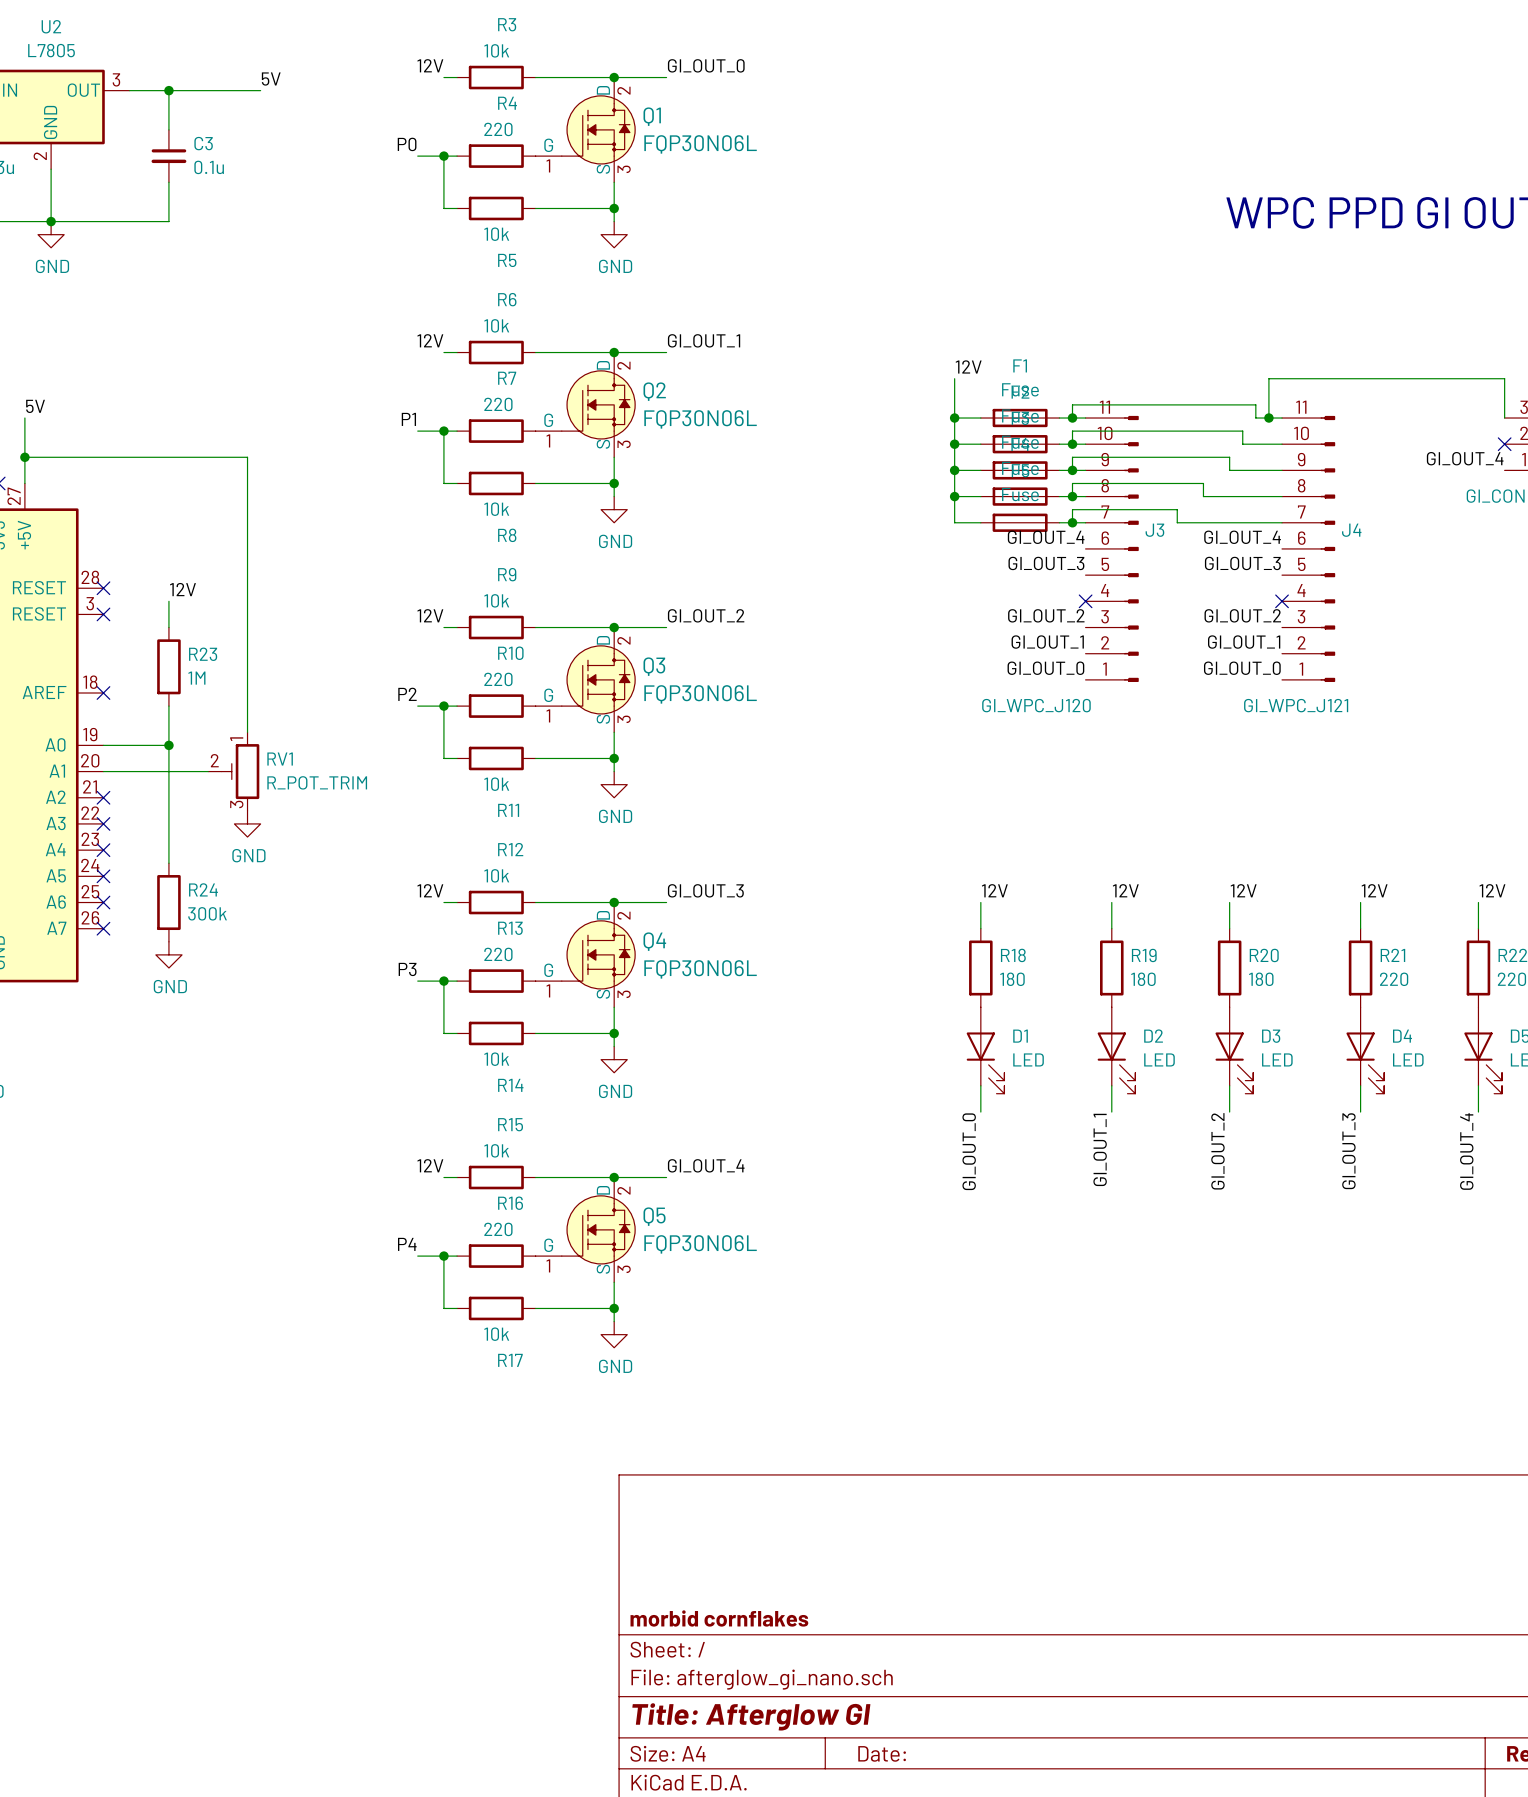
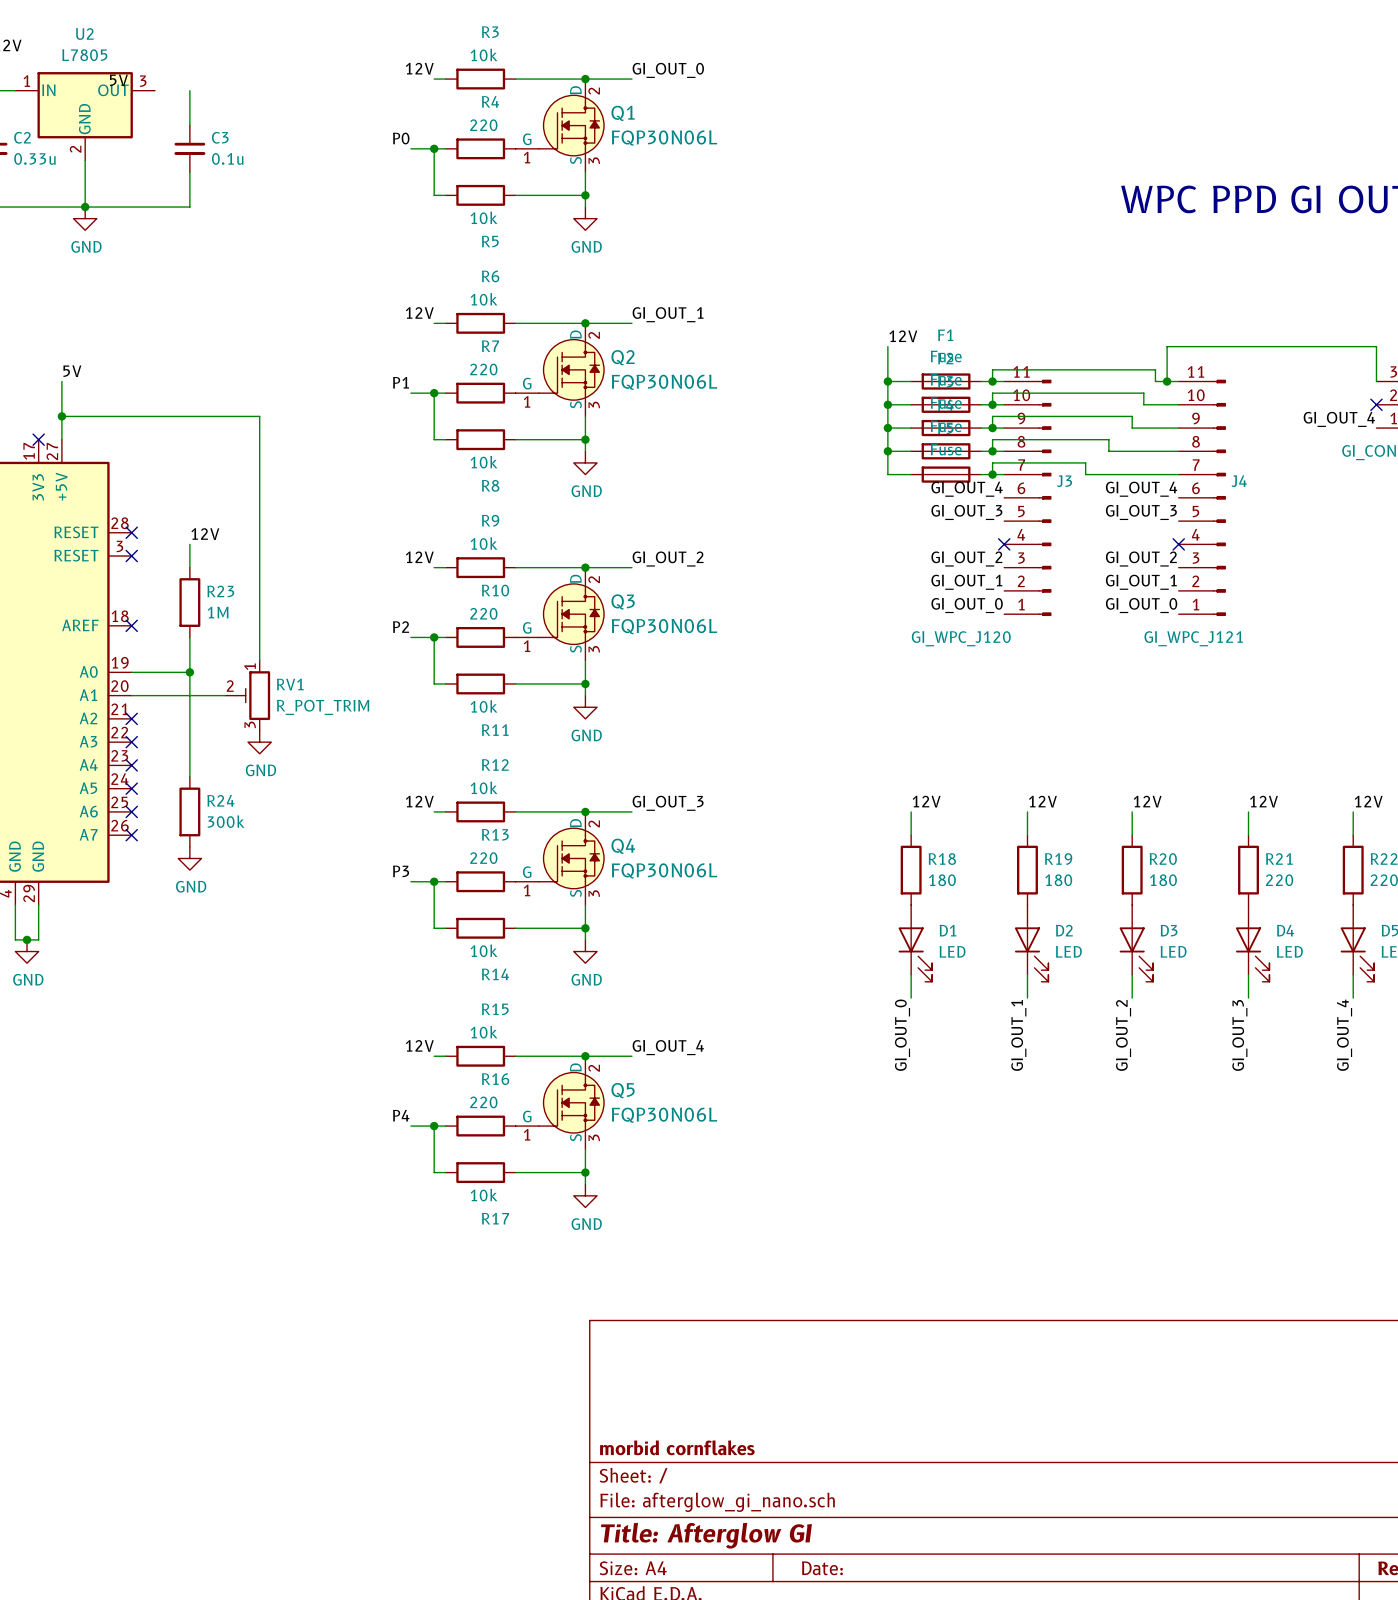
label position: 5V (271, 79) -> 5V (118, 80)
wire: (129, 90) (260, 90) -> none
junction: (168, 90) -> none

